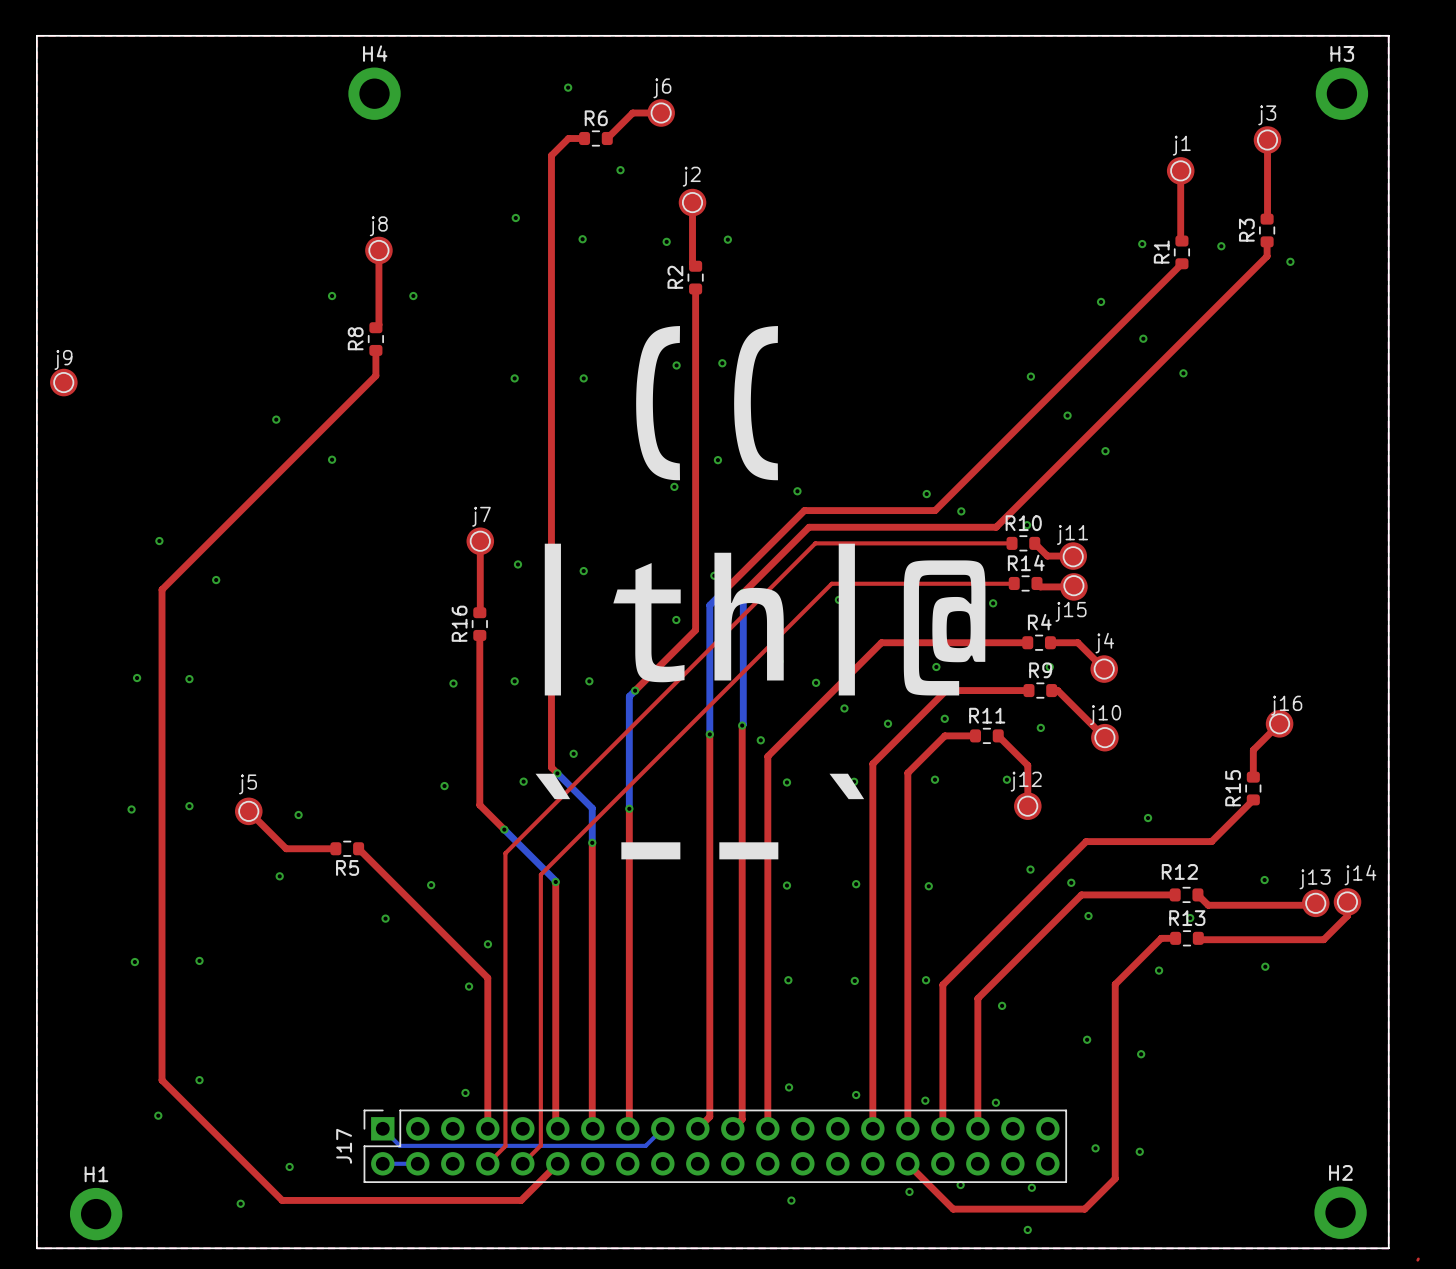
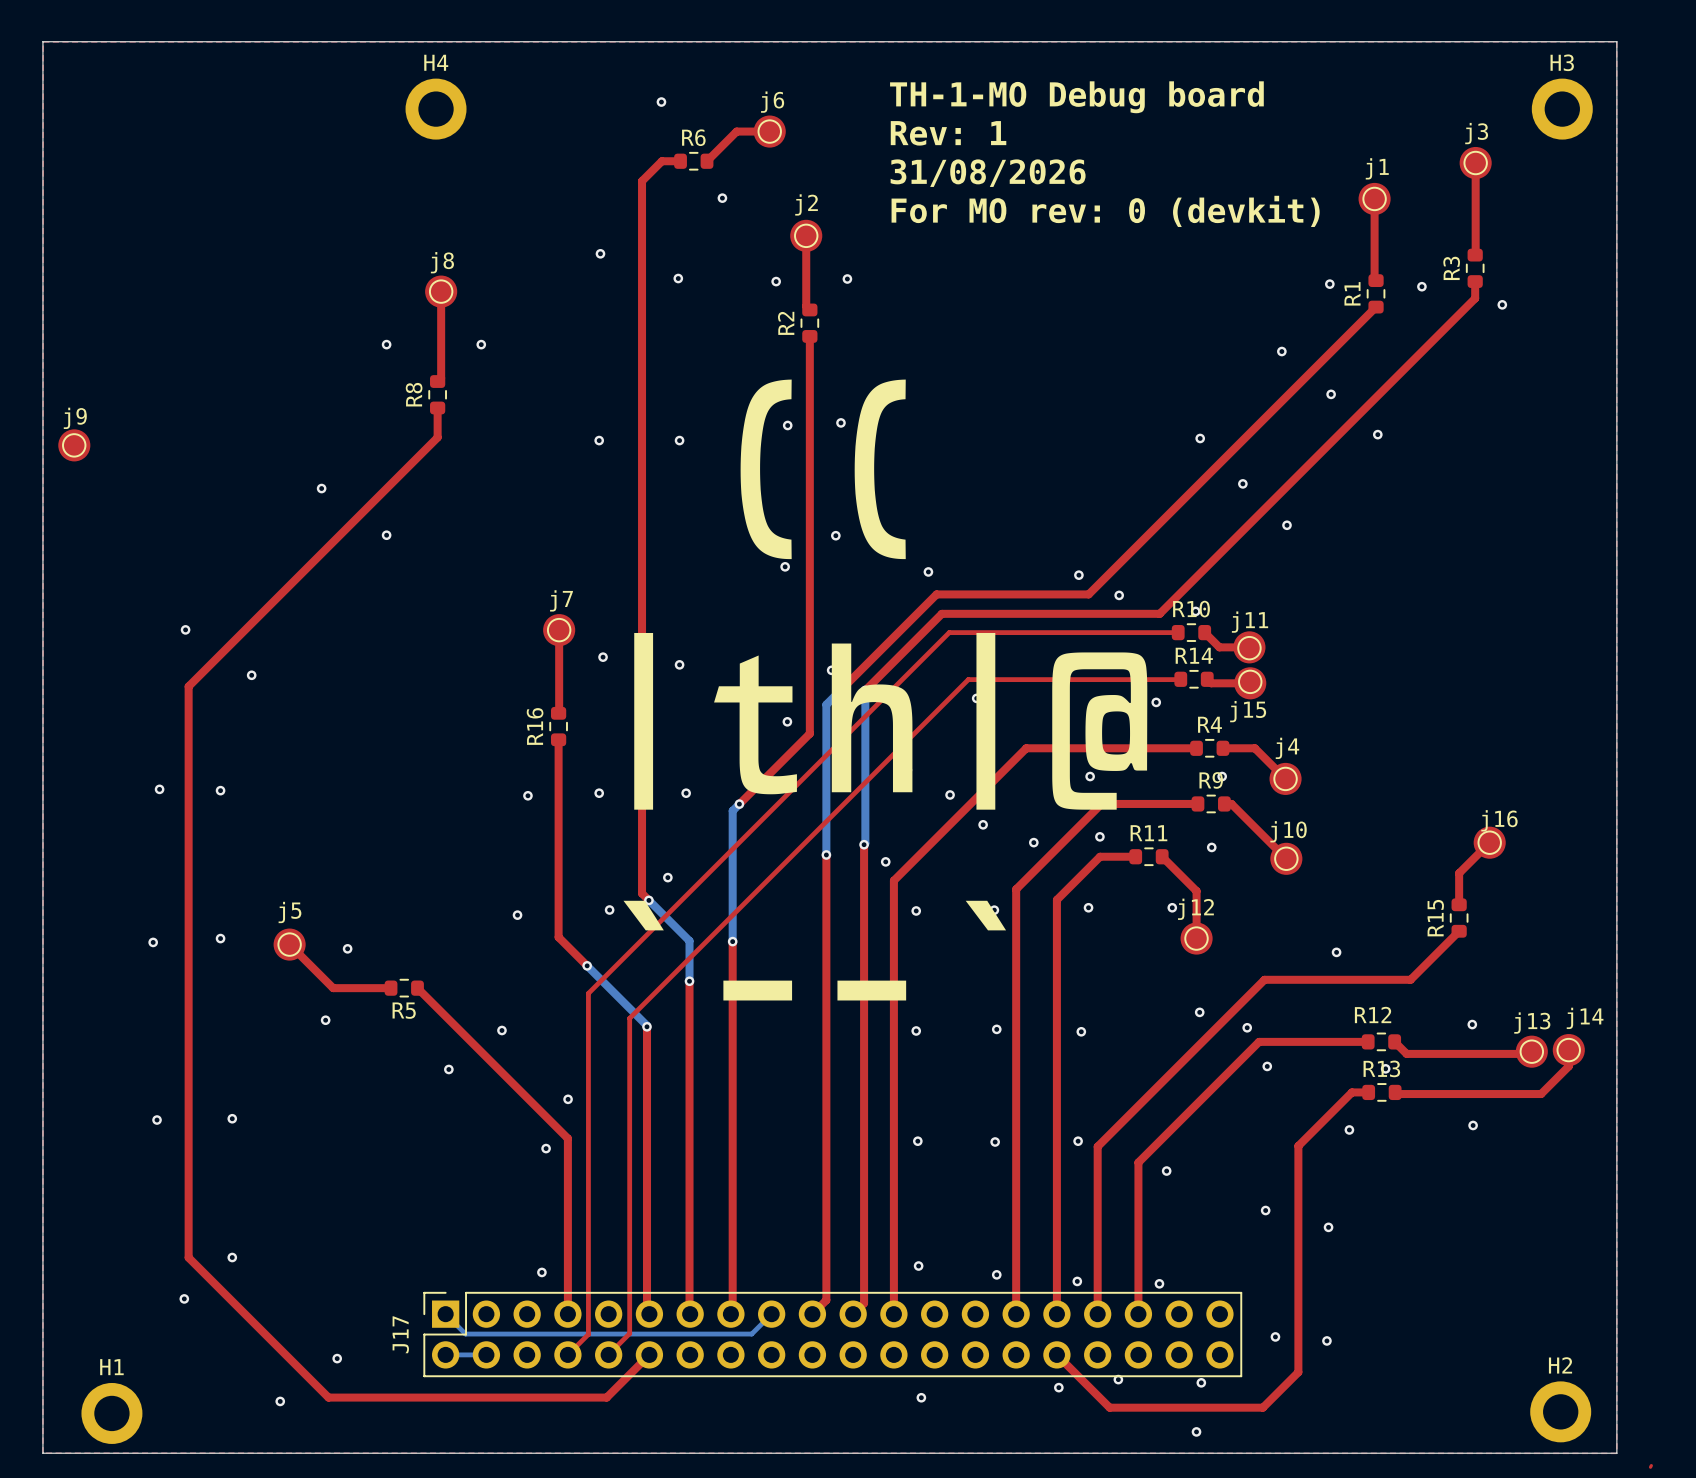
text: none -> TH-1-MO Debug board (1076, 97)
text: none -> Rev: 1 (948, 133)
text: none -> 31/08/2026 (988, 173)
text: none -> For MO rev: 0 (devkit) (1105, 211)

